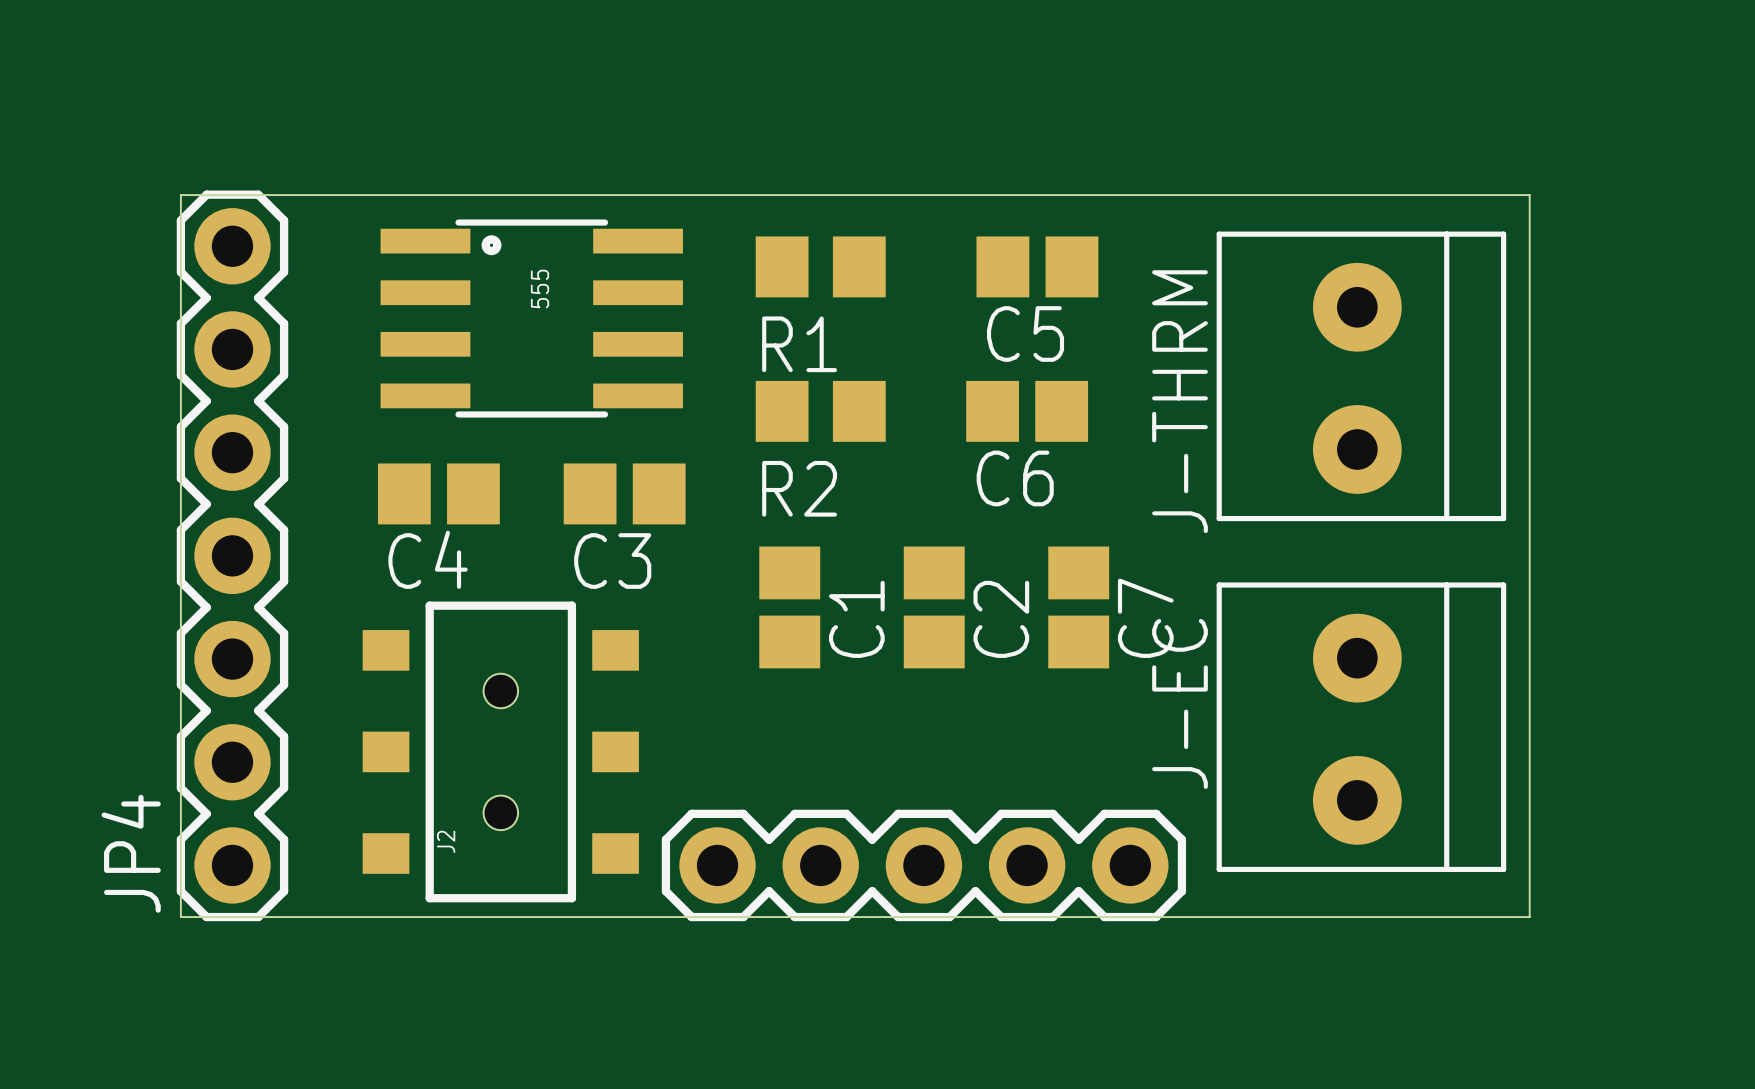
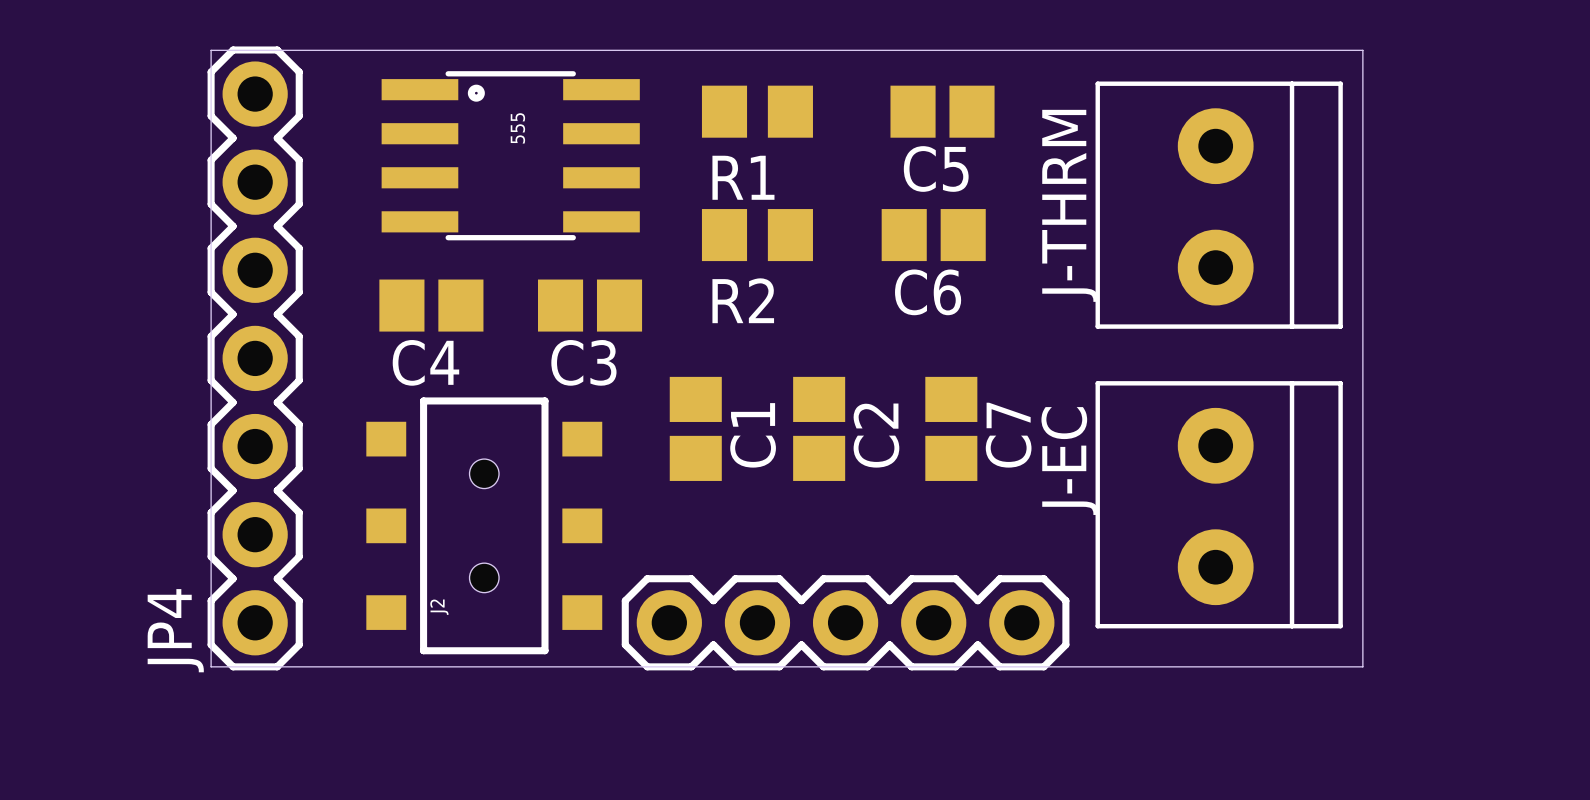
C1 position: (789, 607) -> (695, 428)
C2 position: (934, 607) -> (819, 428)
C7 position: (1078, 607) -> (951, 428)

